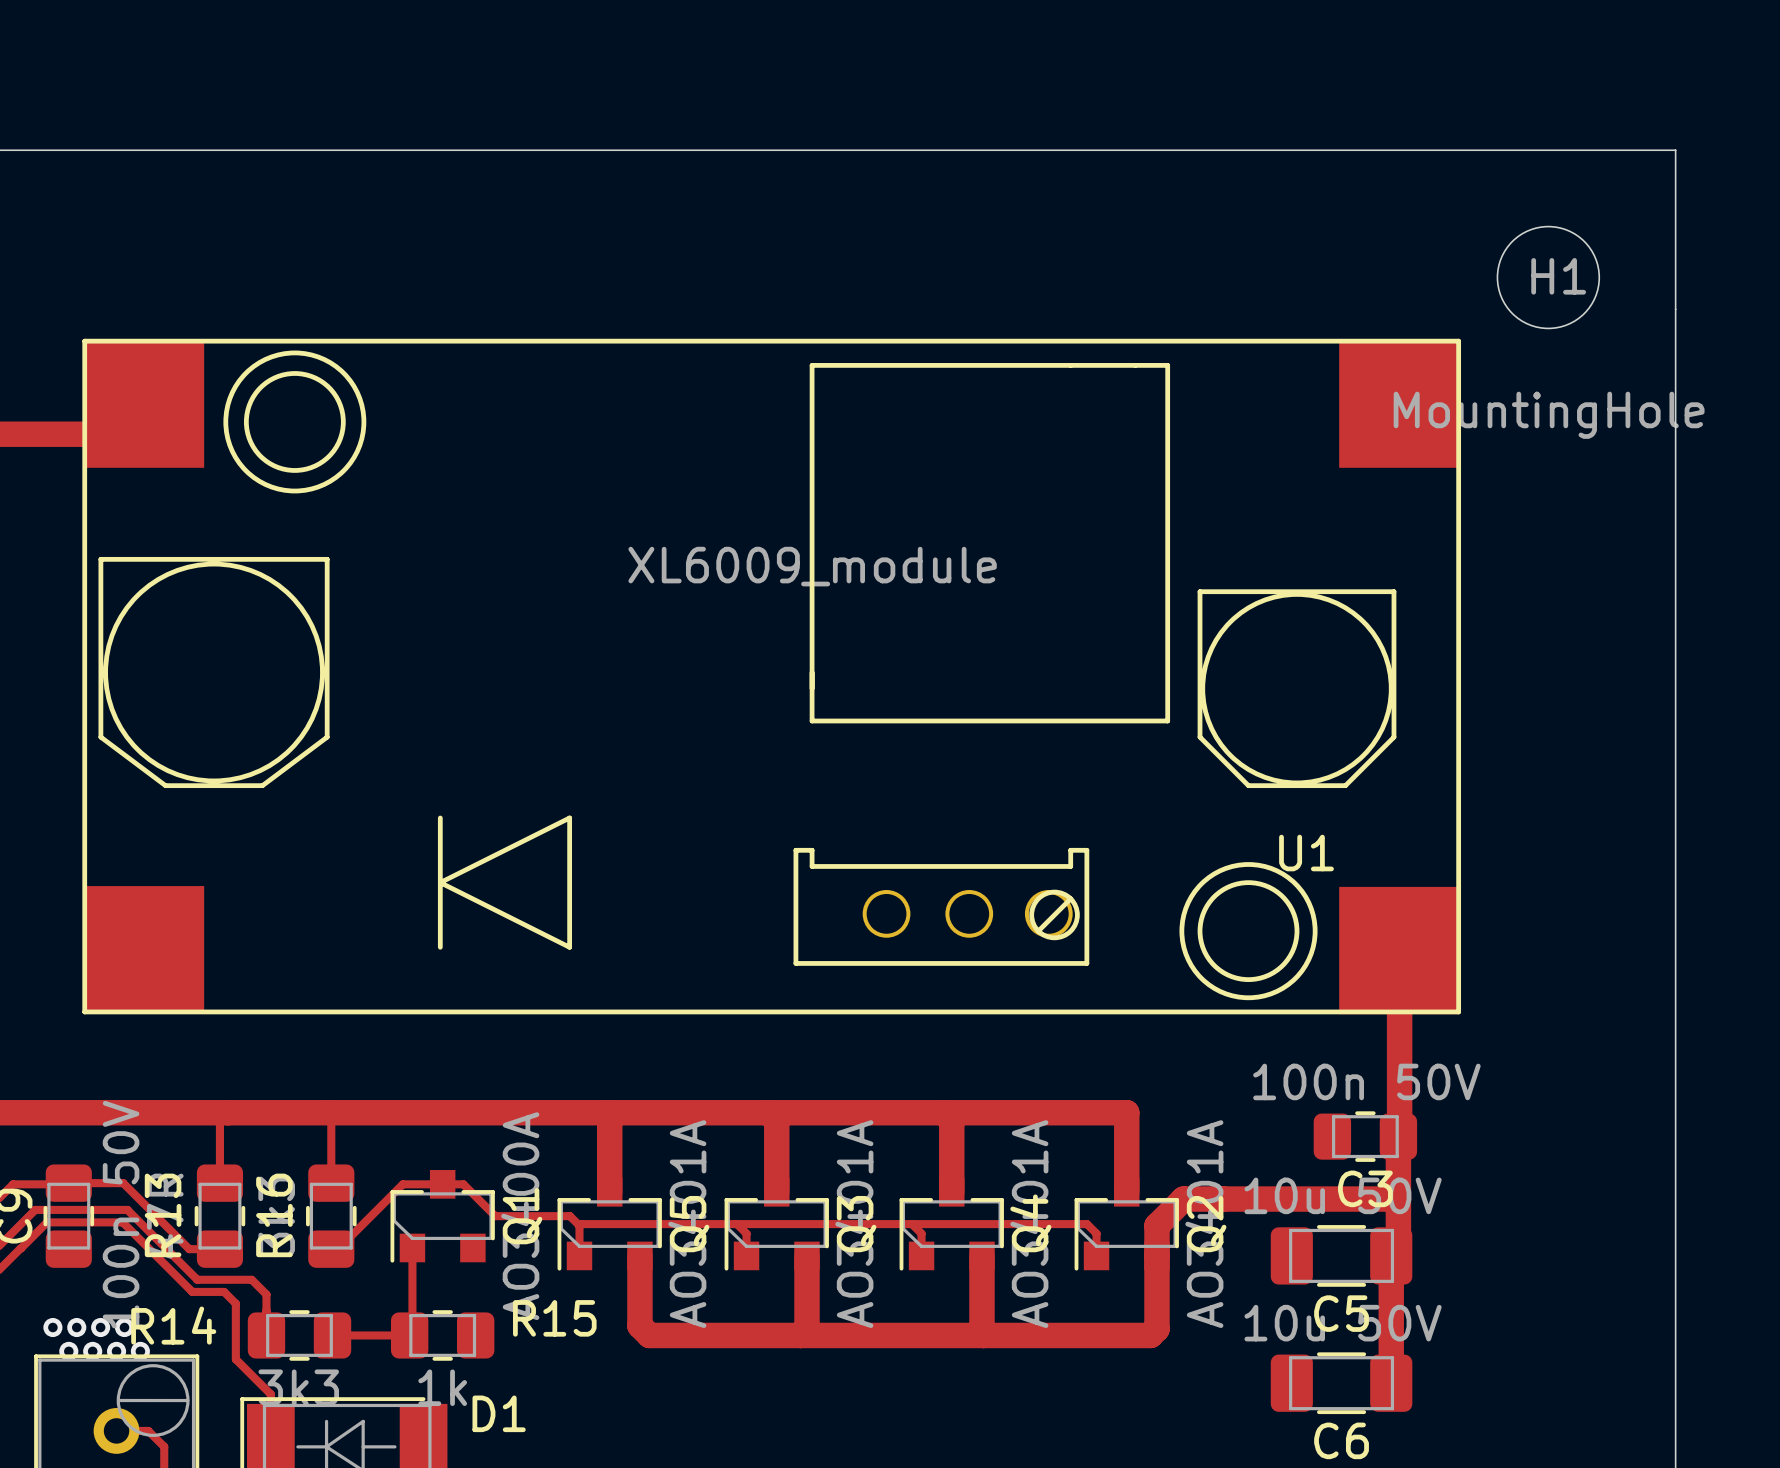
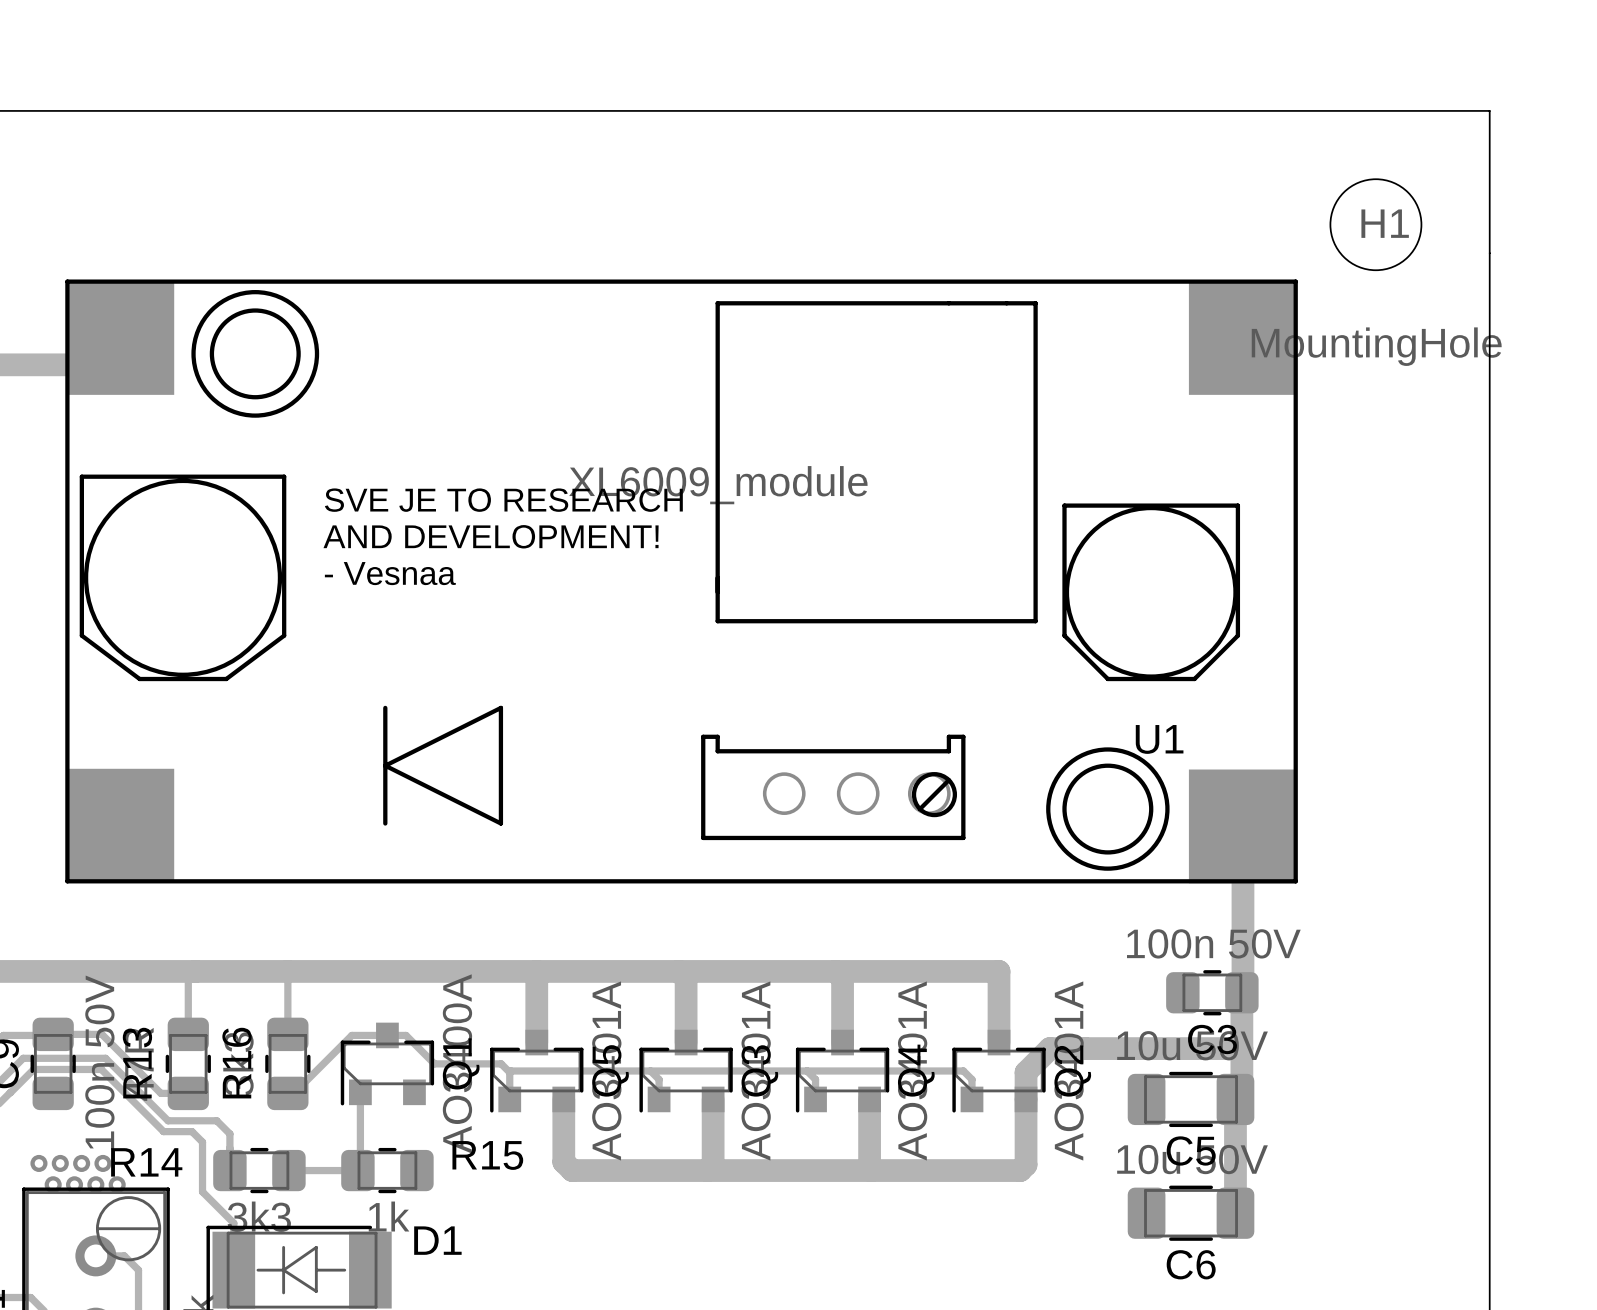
text: none -> SVE JE TO RESEARCH (503, 500)
text: none -> AND DEVELOPMENT! (491, 536)
text: none -> - Vesnaa (390, 573)

